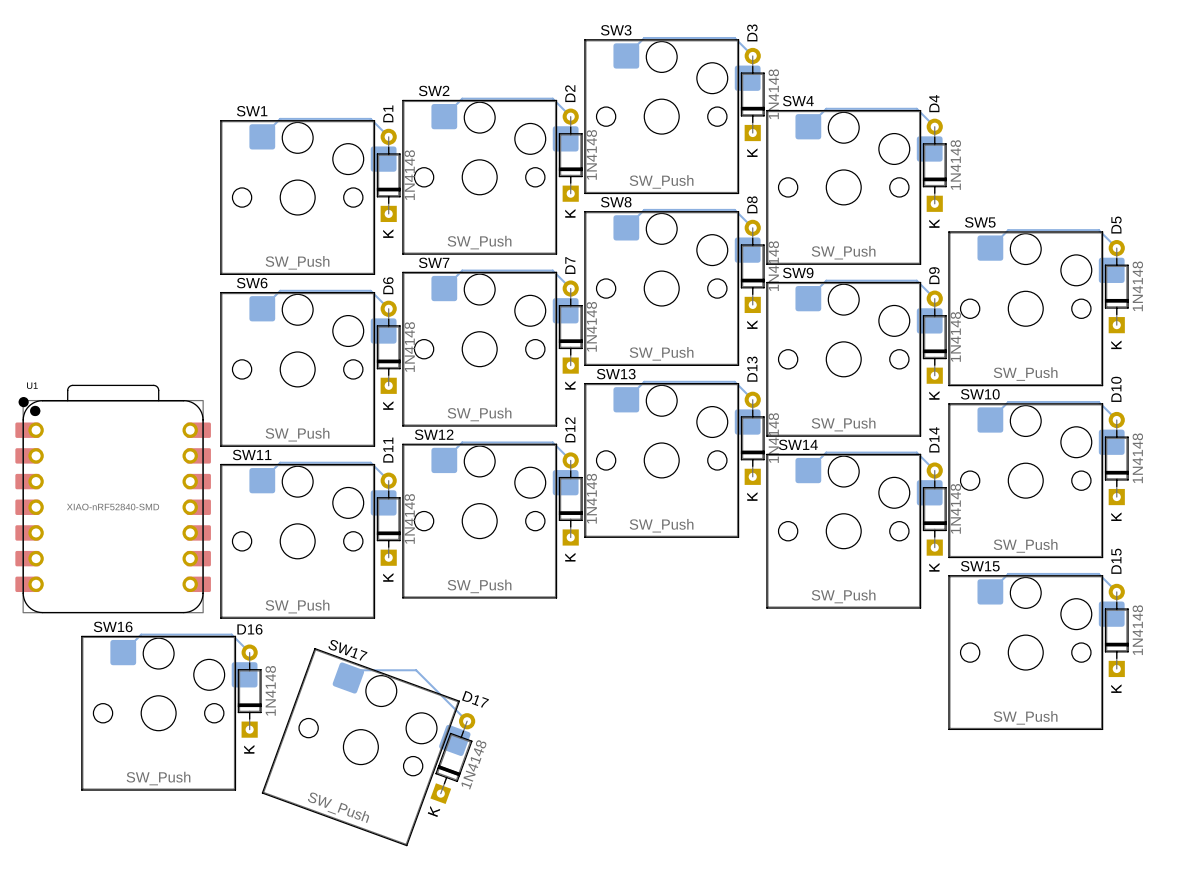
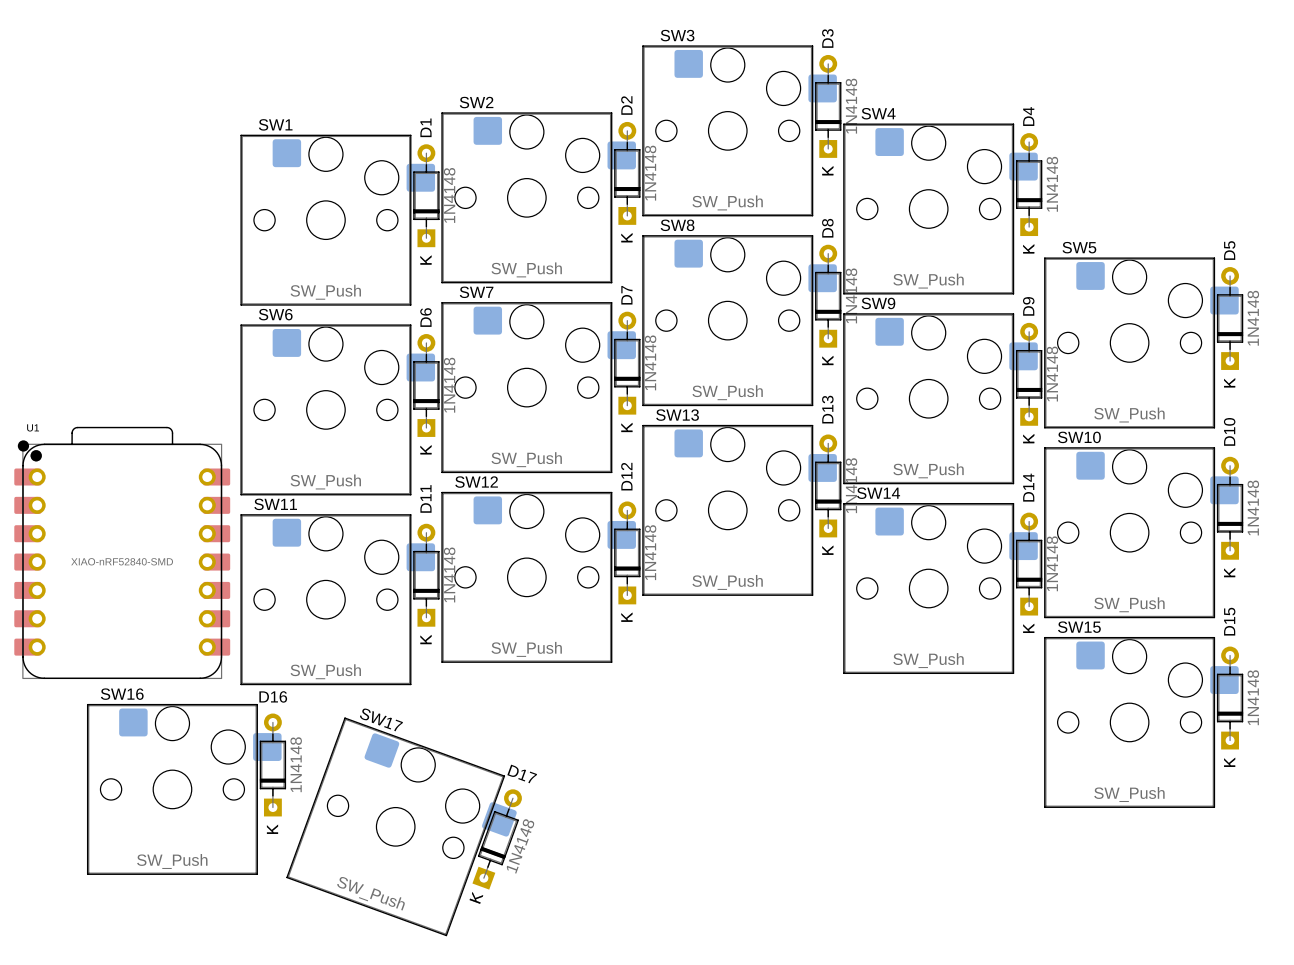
bottom track: (626, 55) (644, 38) (734, 38) (752, 55) -> none
bottom track: (444, 116) (462, 98) (552, 98) (570, 116) -> none
bottom track: (808, 126) (826, 108) (916, 108) (934, 126) -> none
bottom track: (262, 136) (280, 118) (370, 118) (388, 136) -> none
bottom track: (626, 227) (644, 209) (734, 209) (752, 227) -> none
bottom track: (990, 248) (1008, 230) (1098, 230) (1116, 248) -> none
bottom track: (444, 288) (462, 270) (552, 270) (570, 288) -> none
bottom track: (808, 298) (826, 280) (916, 280) (934, 298) -> none
bottom track: (262, 308) (280, 290) (370, 290) (388, 308) -> none
bottom track: (626, 399) (644, 381) (734, 381) (752, 399) -> none
bottom track: (990, 419) (1008, 402) (1098, 402) (1116, 419) -> none
bottom track: (444, 460) (462, 442) (552, 442) (570, 460) -> none
bottom track: (808, 470) (826, 452) (916, 452) (934, 470) -> none
bottom track: (262, 480) (280, 462) (370, 462) (388, 480) -> none
bottom track: (990, 591) (1008, 573) (1098, 573) (1116, 591) -> none
bottom track: (123, 652) (141, 634) (231, 634) (249, 652) -> none
bottom track: (348, 678) (356, 670) (416, 670) (467, 721) -> none

